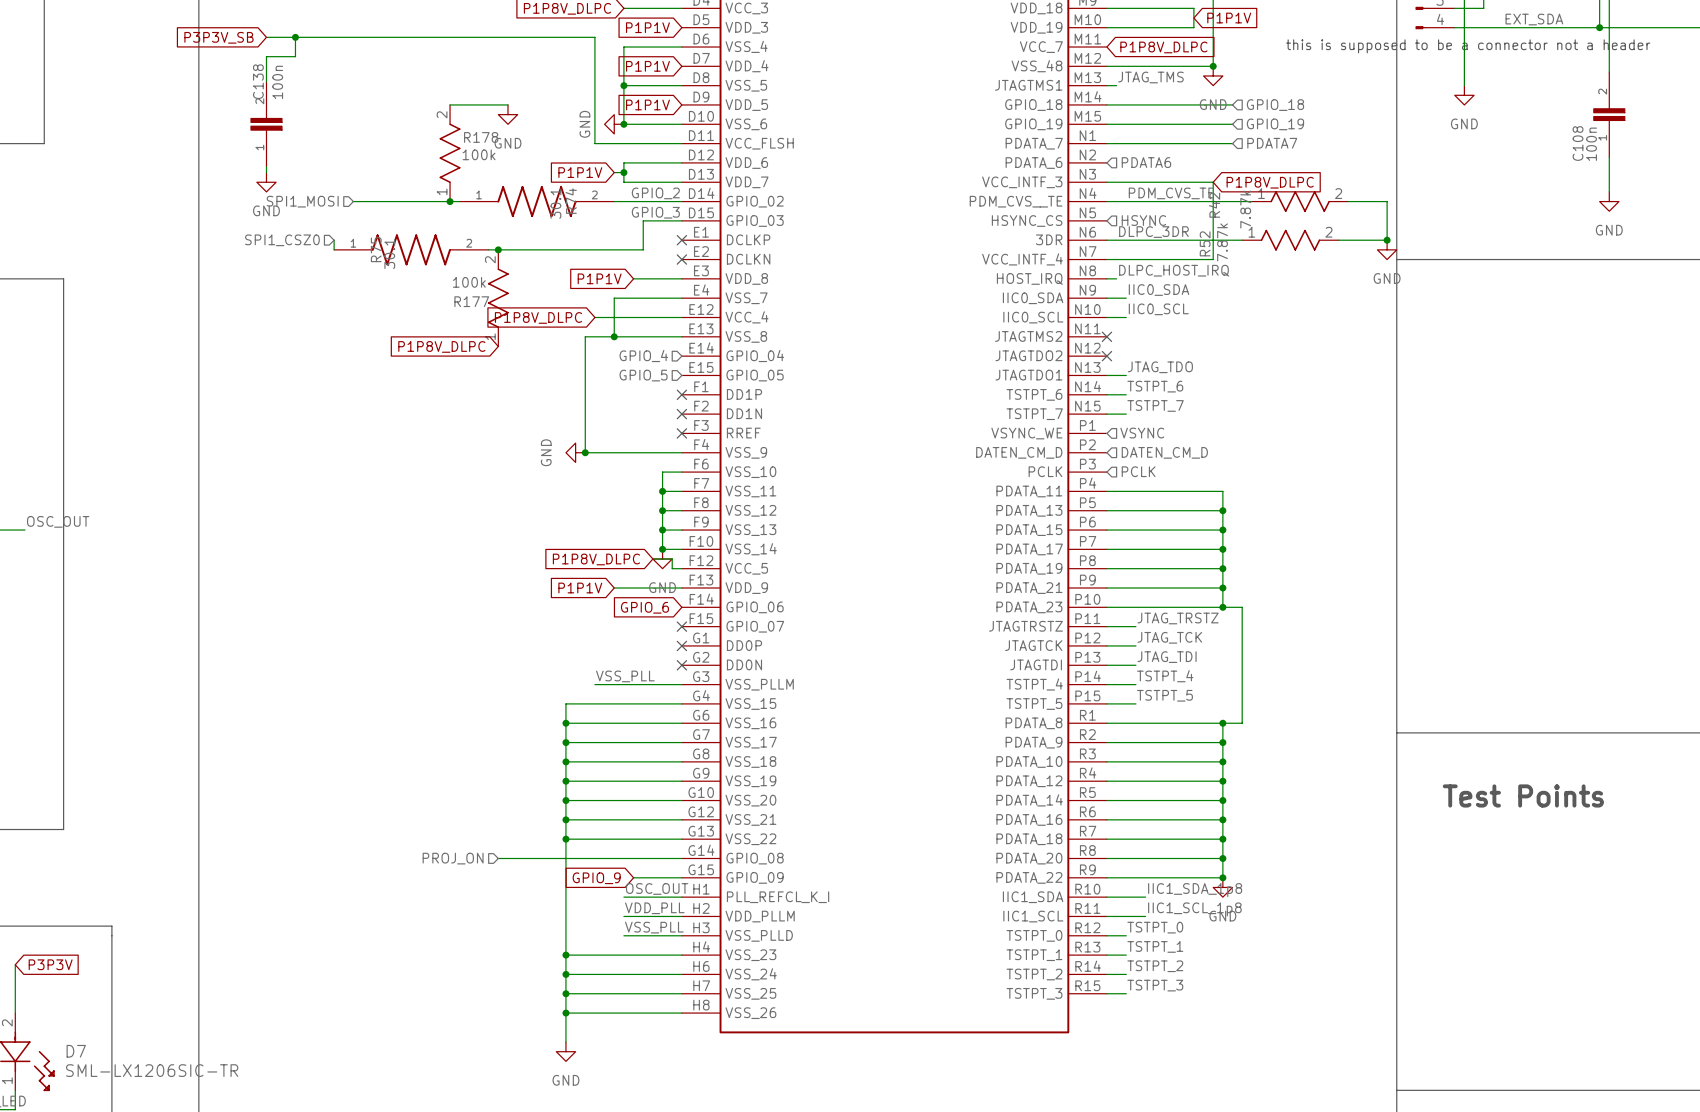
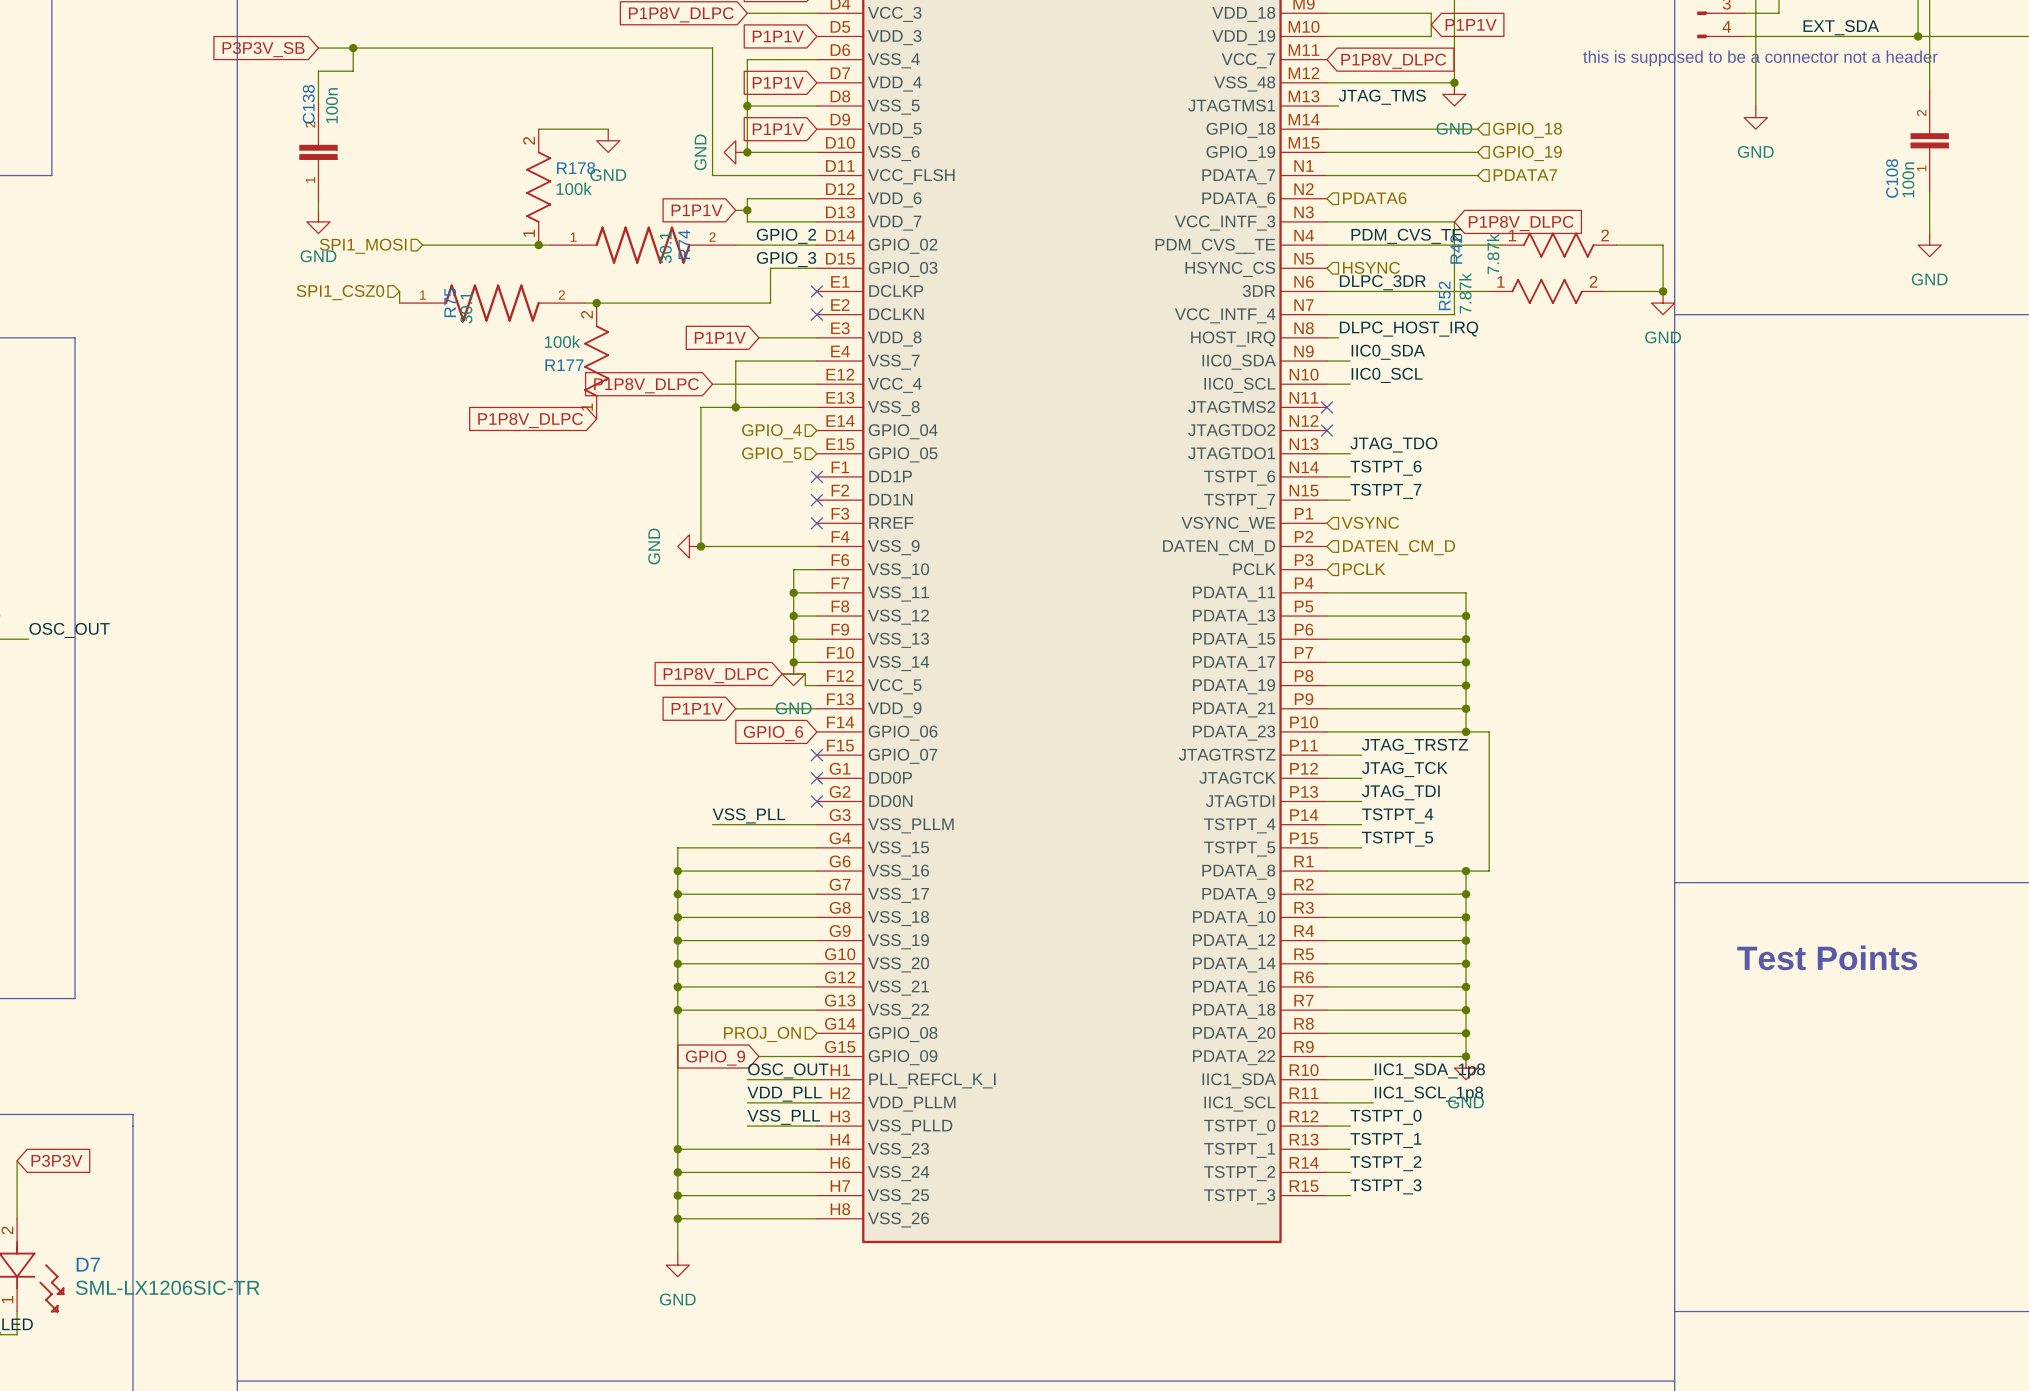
hierarchical label position: PROJ_ON (453, 858) -> PROJ_ON (762, 1034)
wire: (498, 858) (681, 858) -> none

